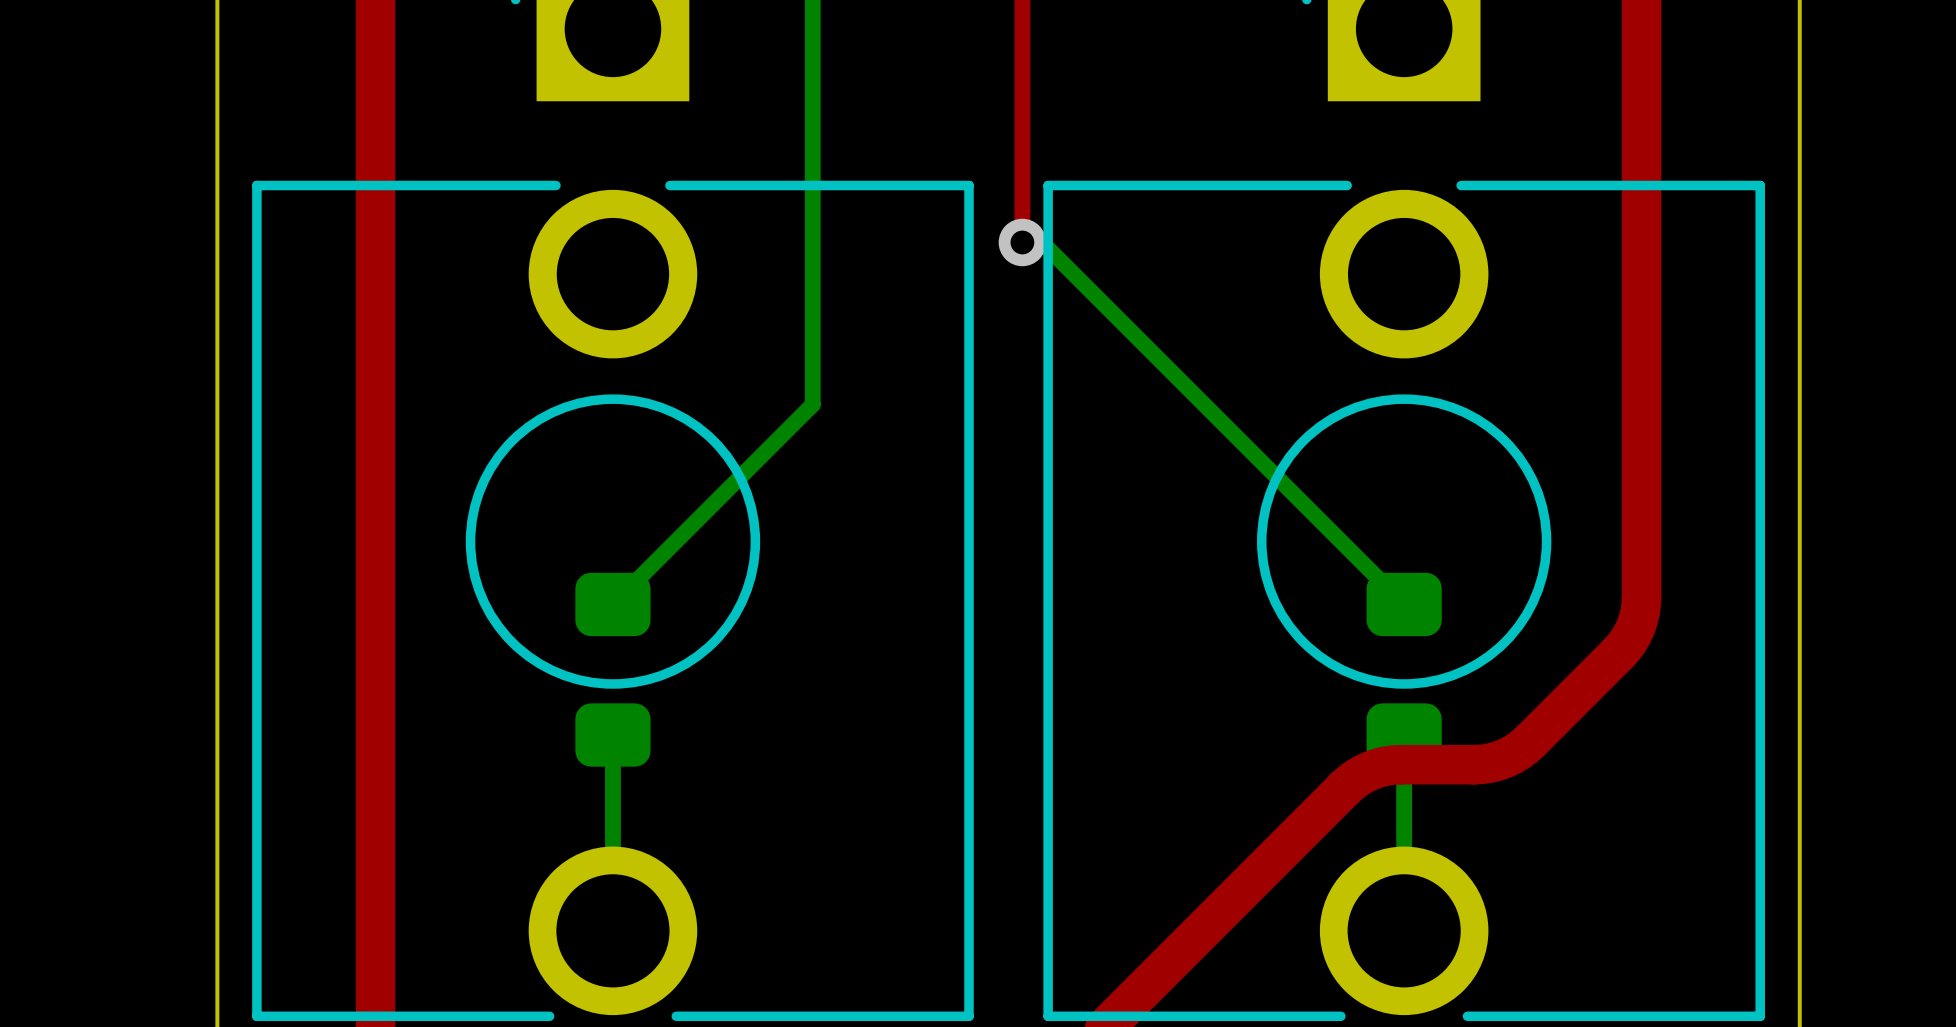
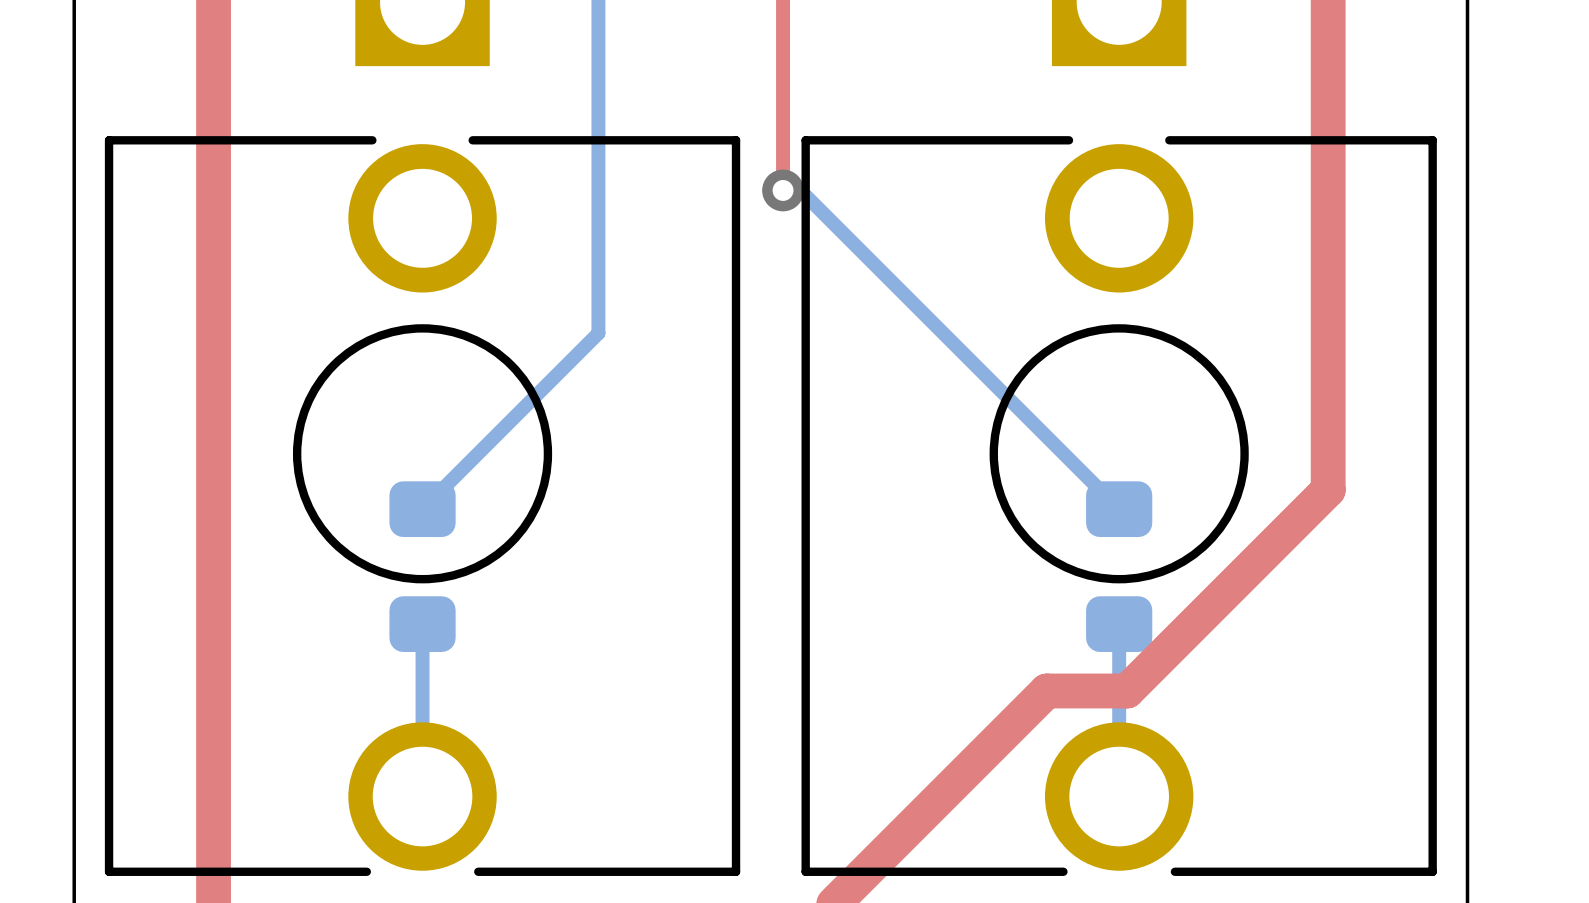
top track: (1641, 582) (1640, 612) (1635, 627) (1628, 641) (1618, 653) (1518, 751) (1497, 761) (1482, 764) (1400, 764) (1377, 768) (1363, 774) (1350, 782) (1321, 810) -> (1328, 490) (1127, 690) (1046, 690)

